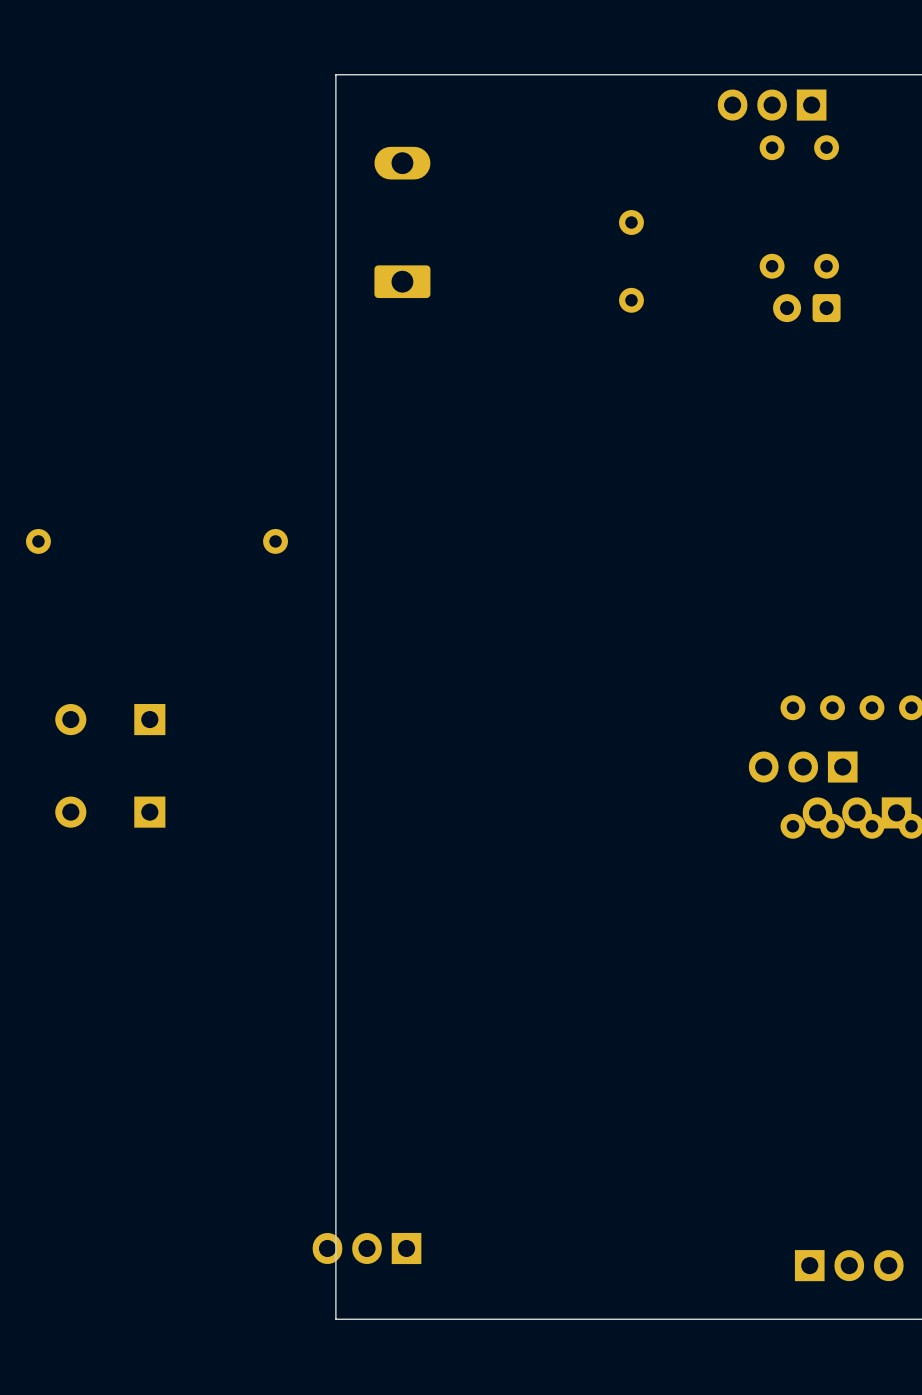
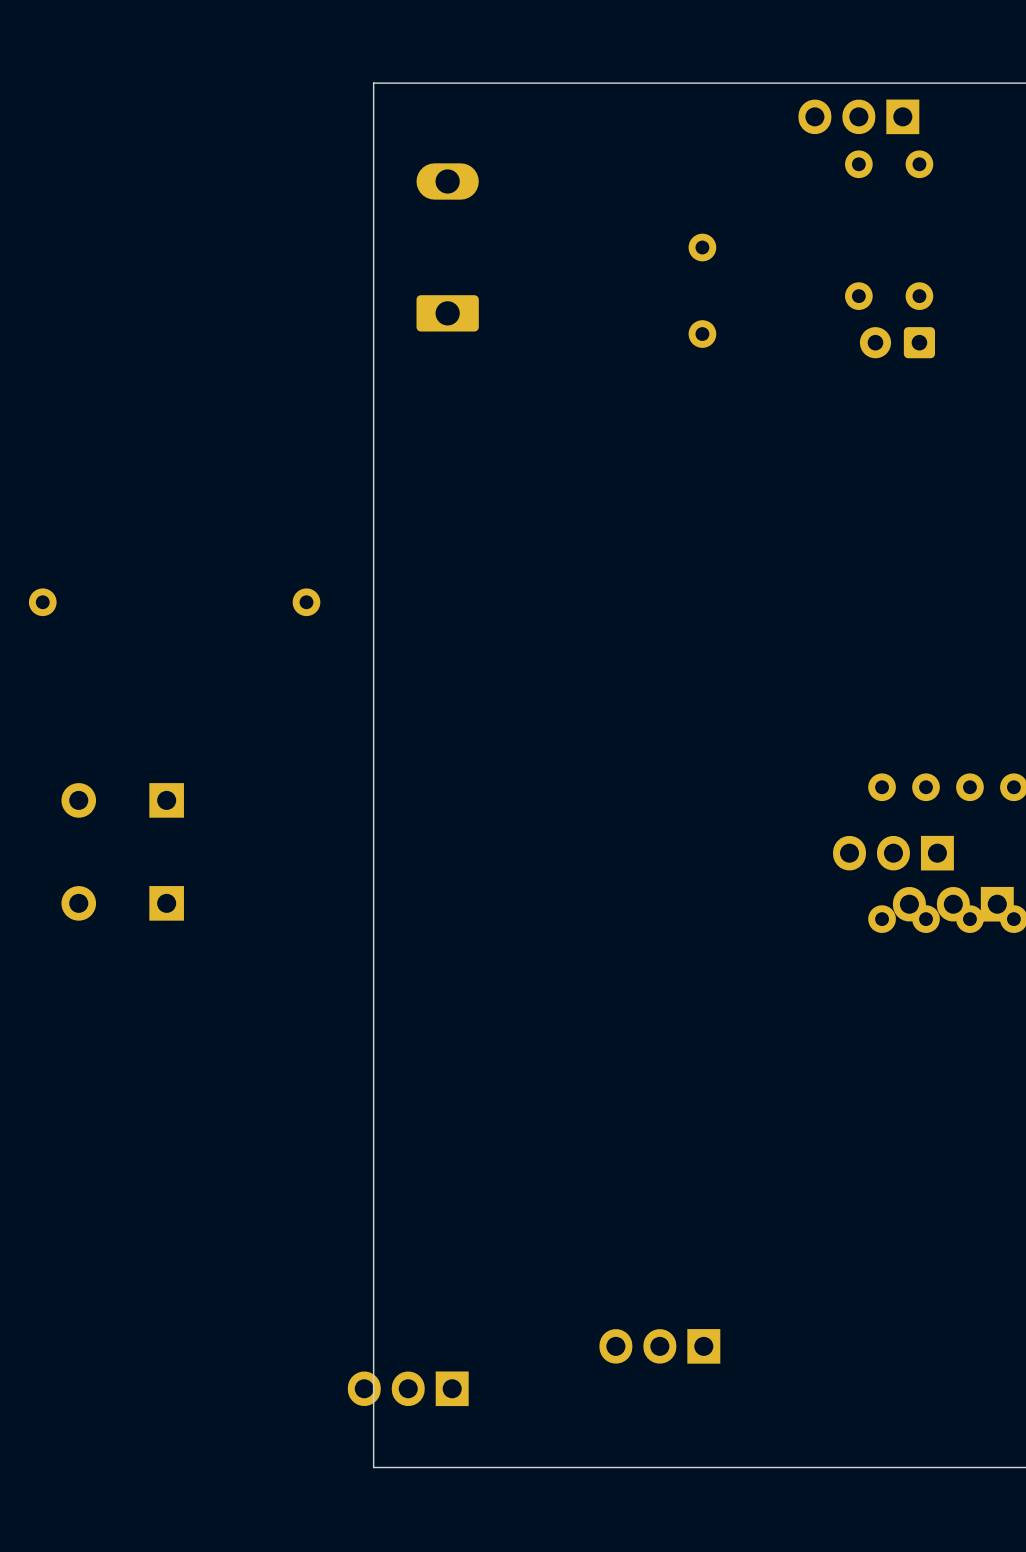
part rotation: 0° (849, 1265) -> 180° (659, 1346)
part position: (849, 1265) -> (659, 1346)

